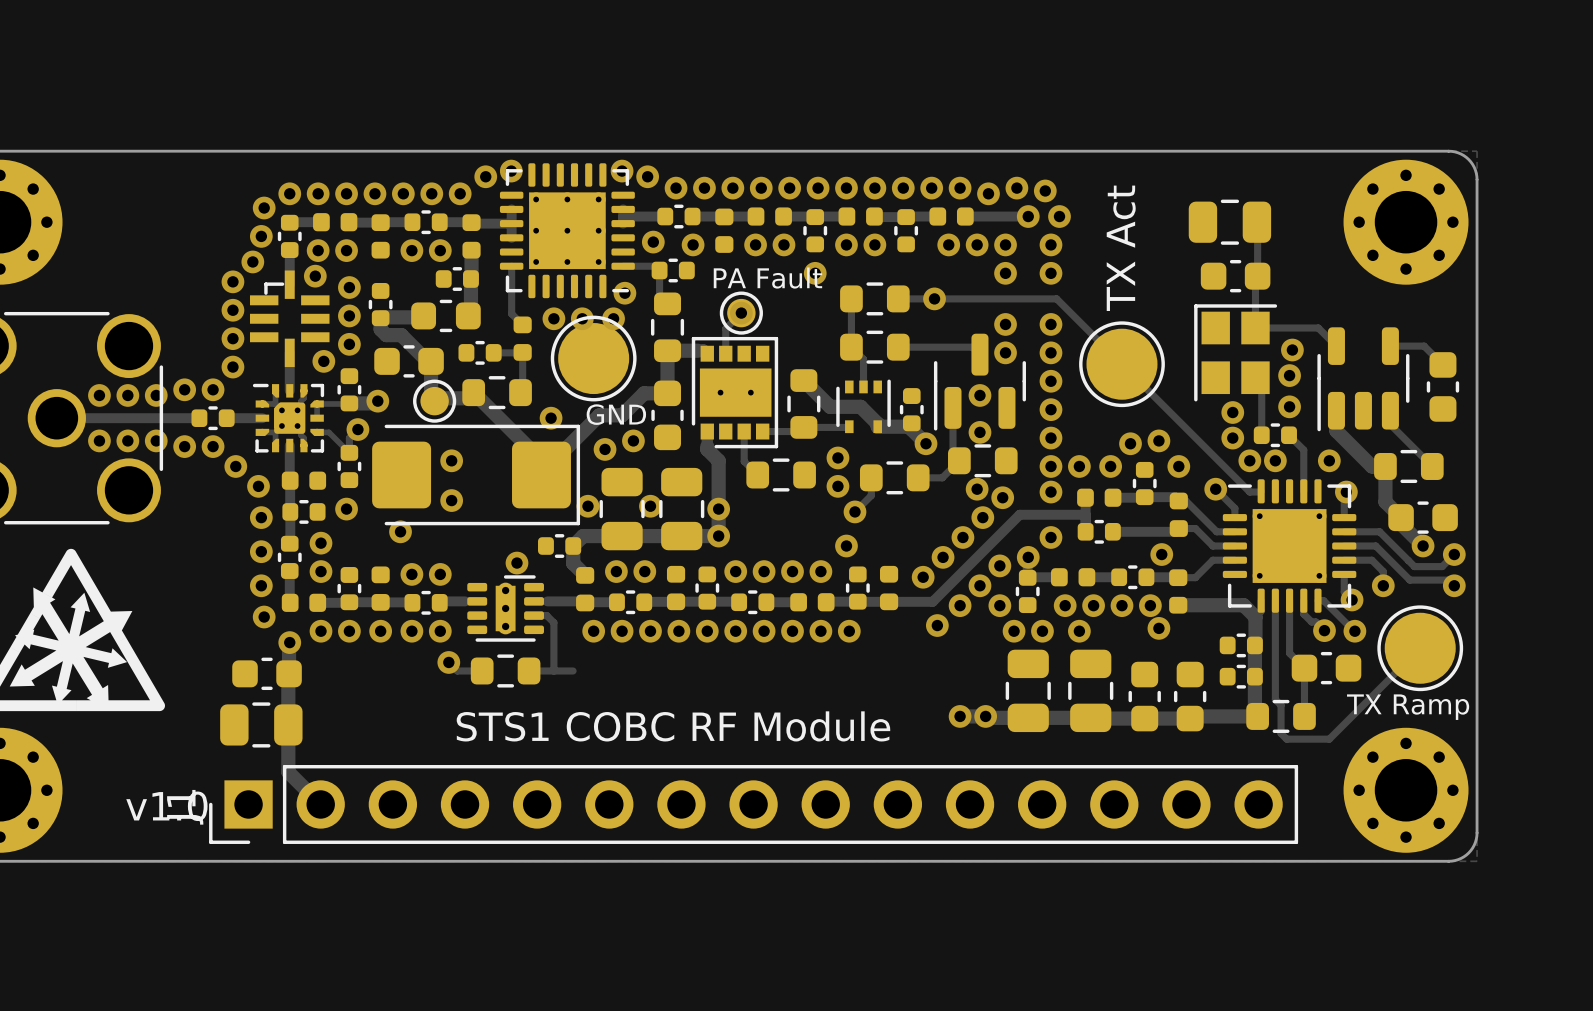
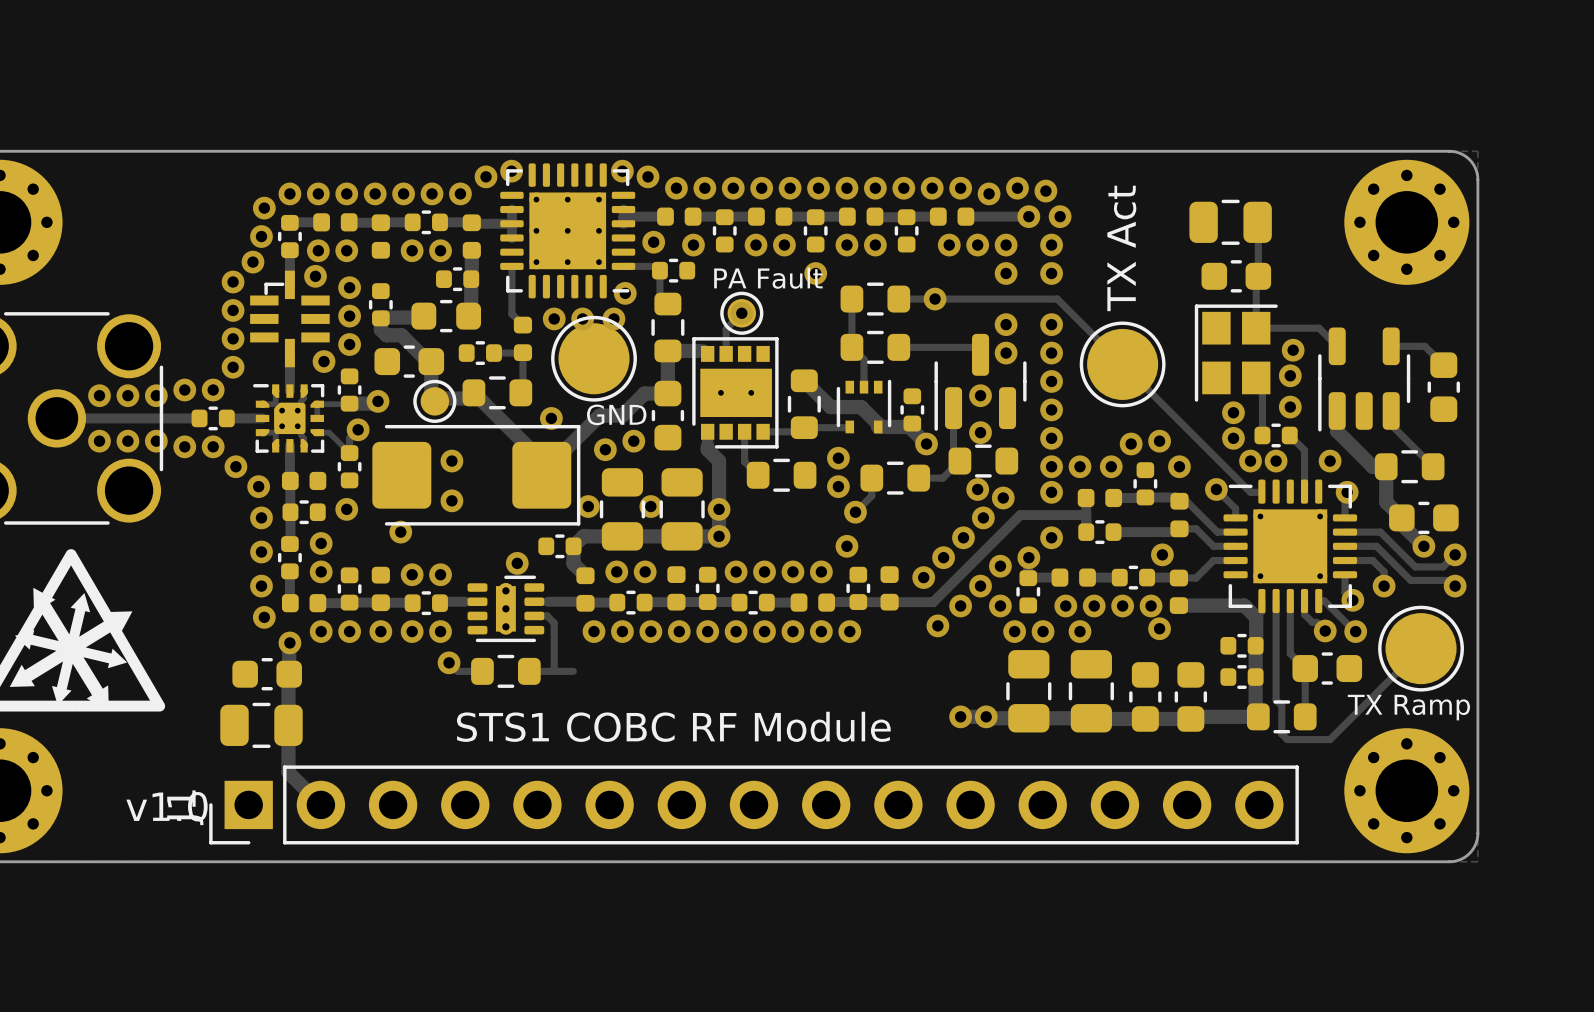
part footprint: [657, 204, 701, 229] -> [657, 207, 702, 226]
part footprint: [715, 208, 734, 253] -> [712, 209, 737, 253]

